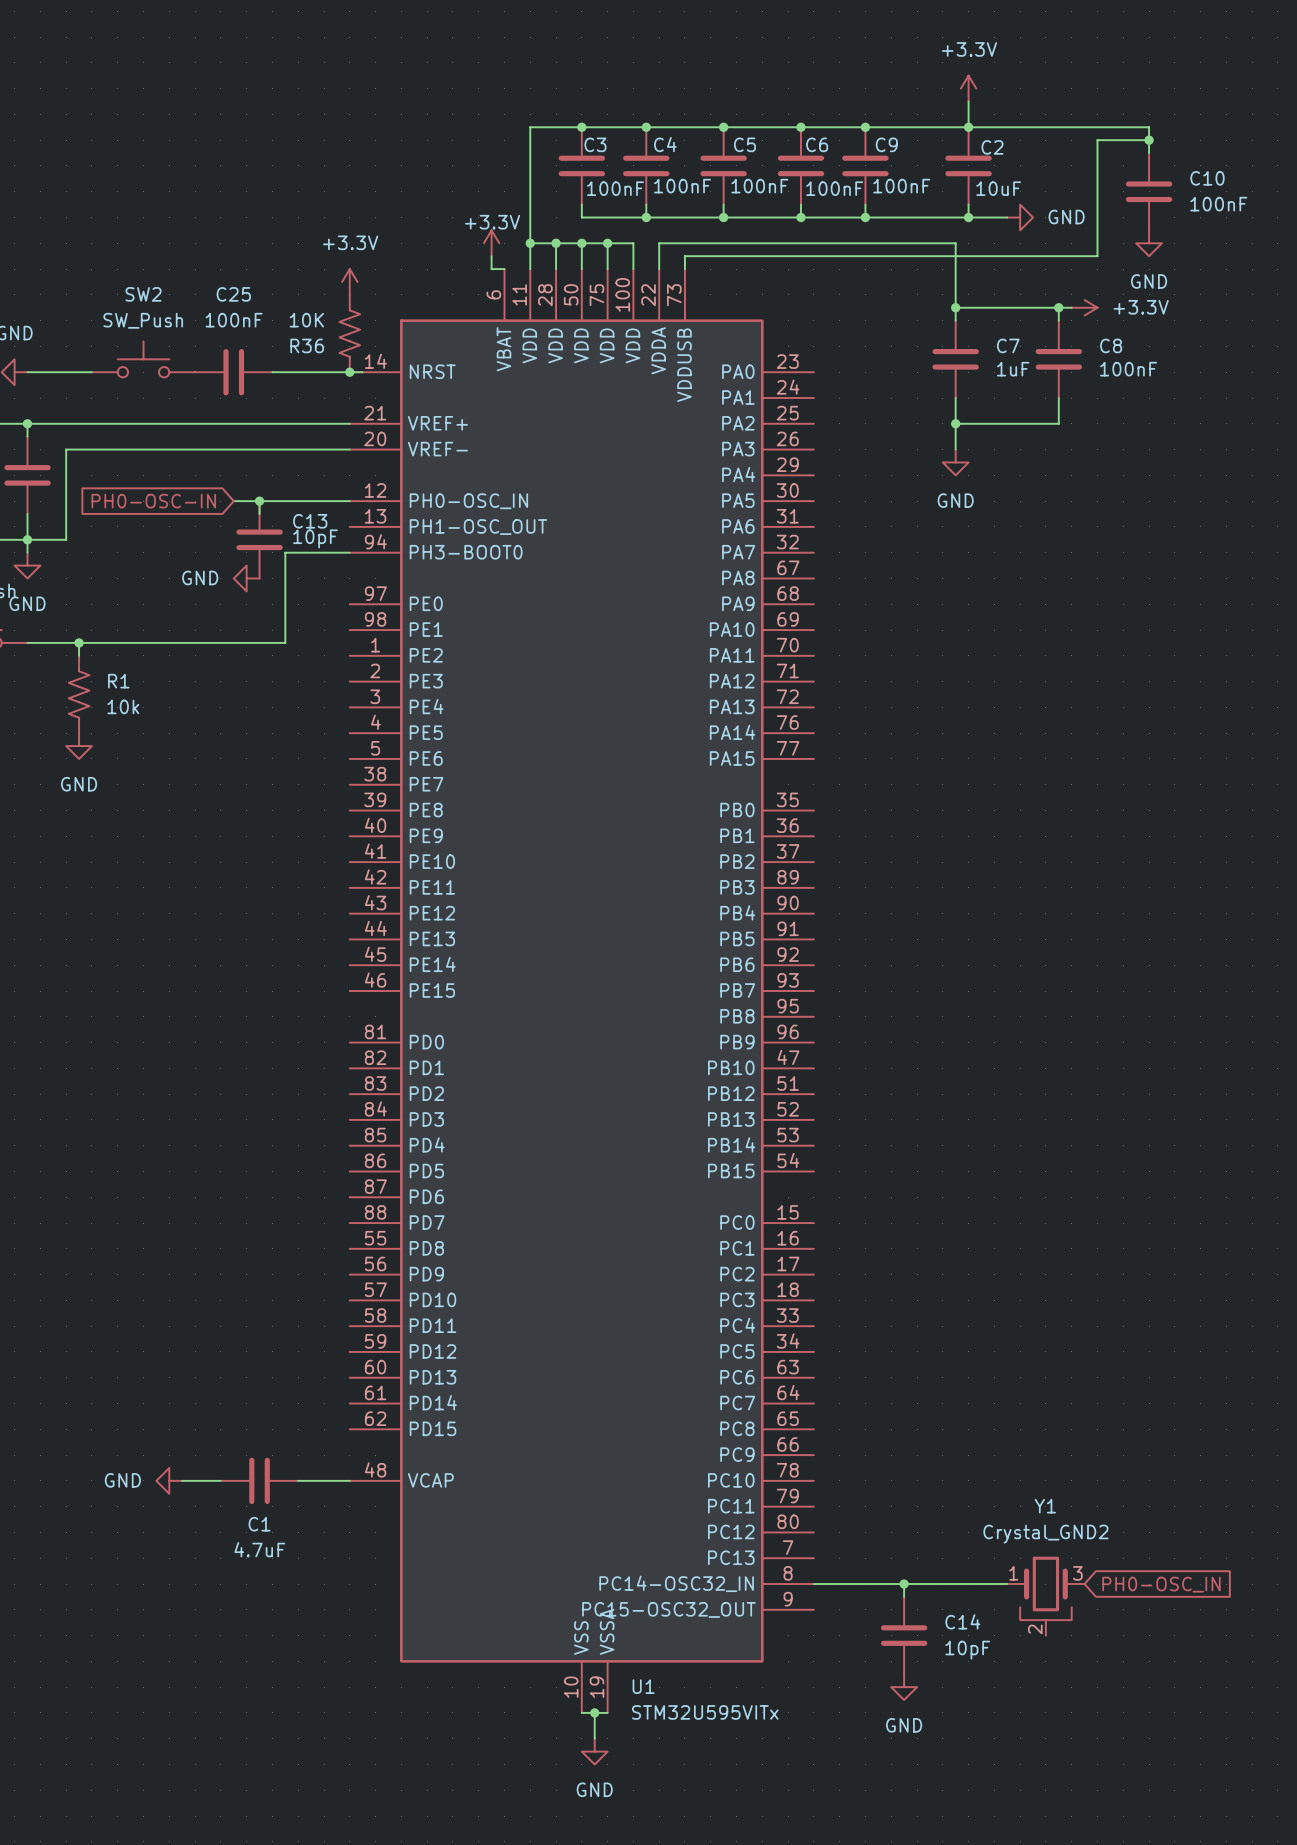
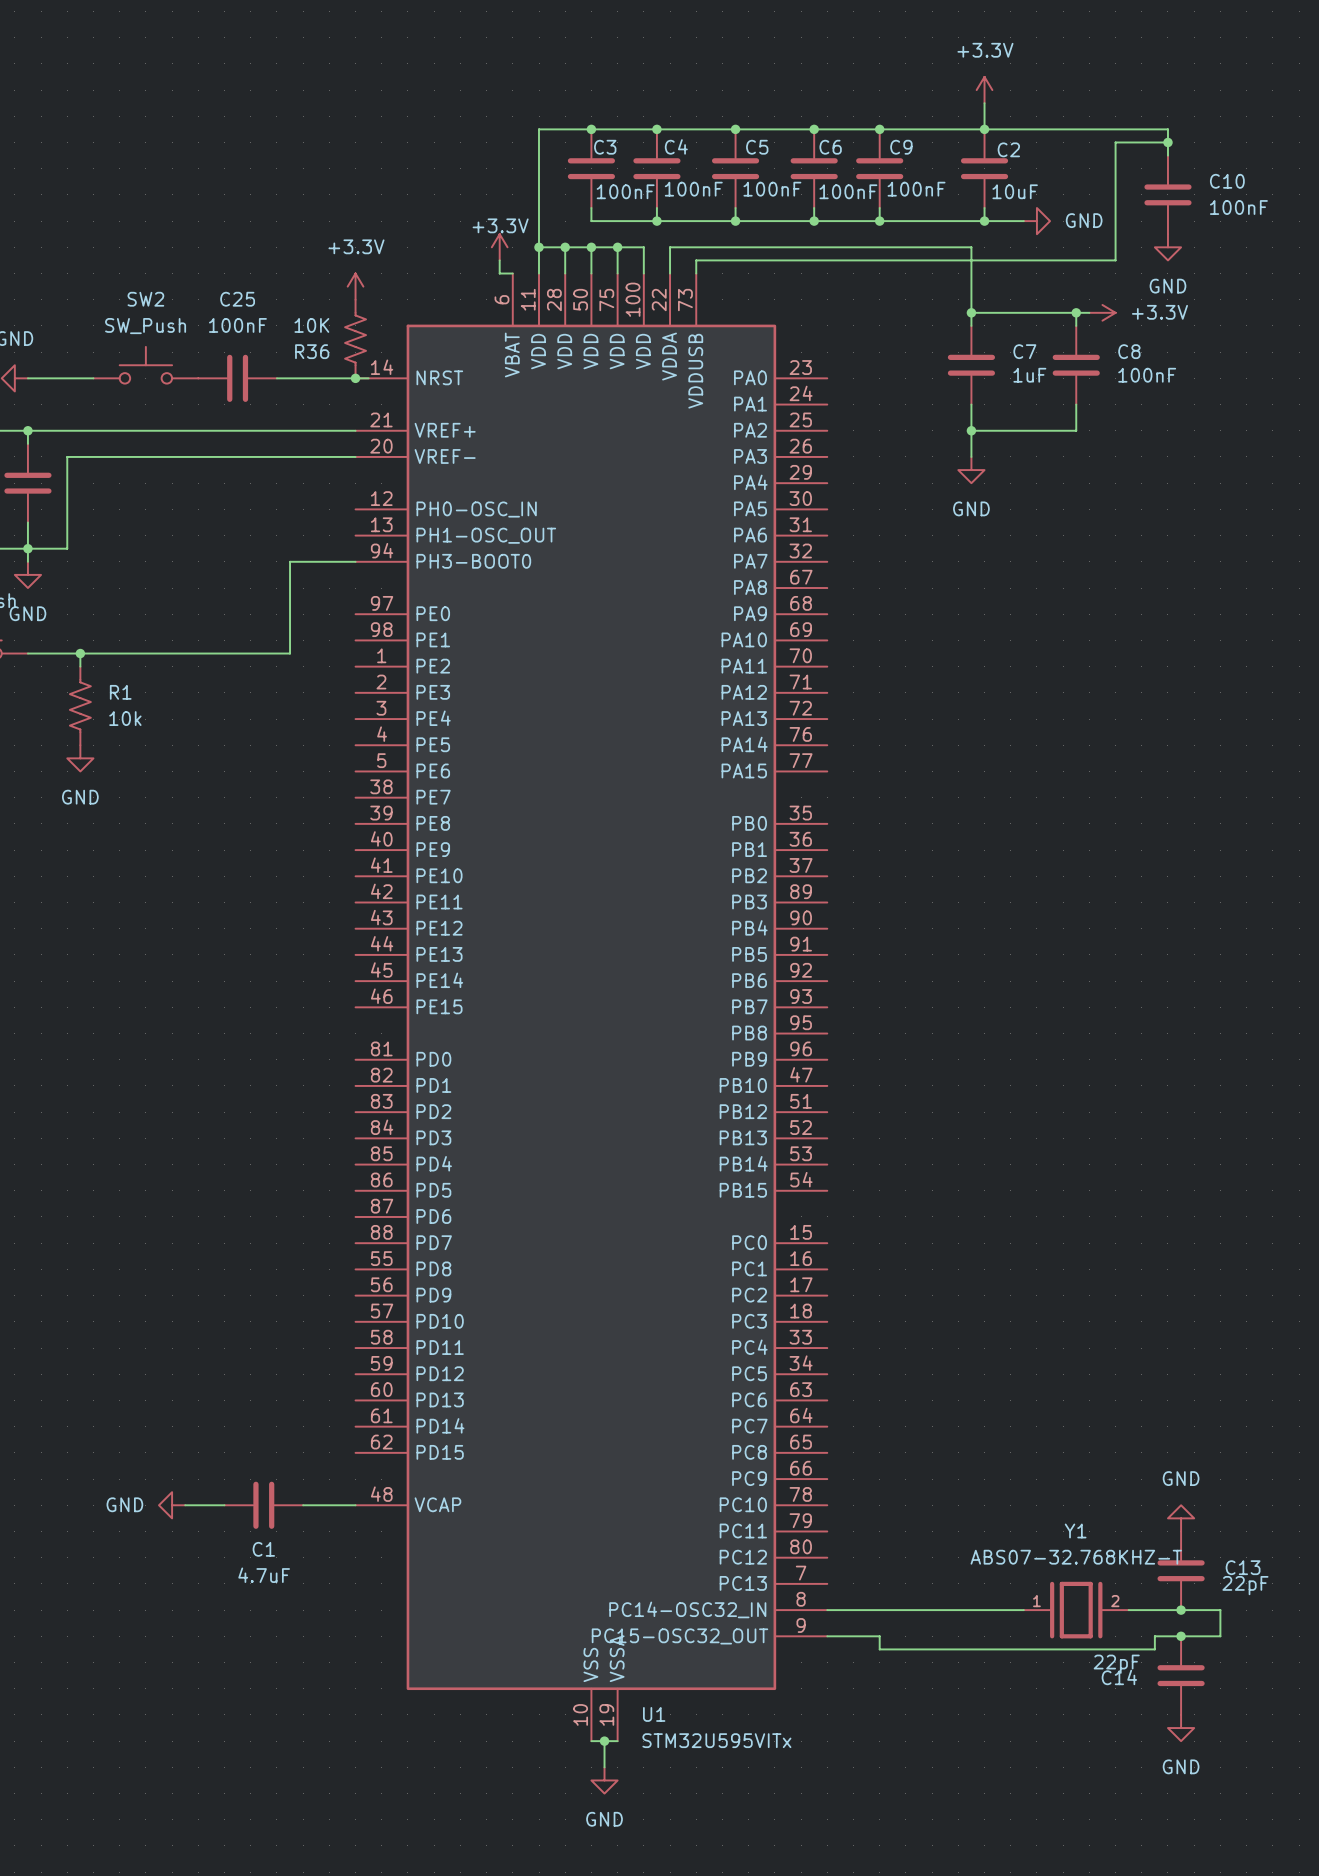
global label: PH0-OSC-IN (153, 501) -> none
wire: (233, 501) (349, 501) -> none
wire: (259, 501) (259, 514) -> none
junction: (259, 501) -> none
C13 name position: C13 (310, 521) -> C13 (1243, 1567)
C13 value: 10pF (315, 538) -> 22pF (1245, 1585)
C13 position: (259, 539) -> (1181, 1570)
power symbol: GND (246, 578) -> none
power symbol: none -> GND (1181, 1518)
Y1 value: Crystal_GND2 (1045, 1534) -> ABS07-32.768KHZ-T (1076, 1557)
Y1 symbol: [1007, 1556, 1085, 1636] -> [1023, 1581, 1129, 1639]
wire: (904, 1584) (904, 1596) -> none
junction: (904, 1584) -> none
wire: none -> (1128, 1610) (1220, 1610) (1220, 1636) (1154, 1636) (1154, 1649) (879, 1649) (879, 1636) (827, 1636)
junction: none -> (1181, 1610)
global label: PH0-OSC_IN (1161, 1584) -> none
junction: none -> (1181, 1636)
C14 name position: C14 (962, 1621) -> C14 (1119, 1677)
C14 position: (904, 1635) -> (1181, 1675)
C14 value: 10pF (967, 1650) -> 22pF (1116, 1664)
power symbol: GND (904, 1687) -> none
power symbol: none -> GND (1181, 1728)

